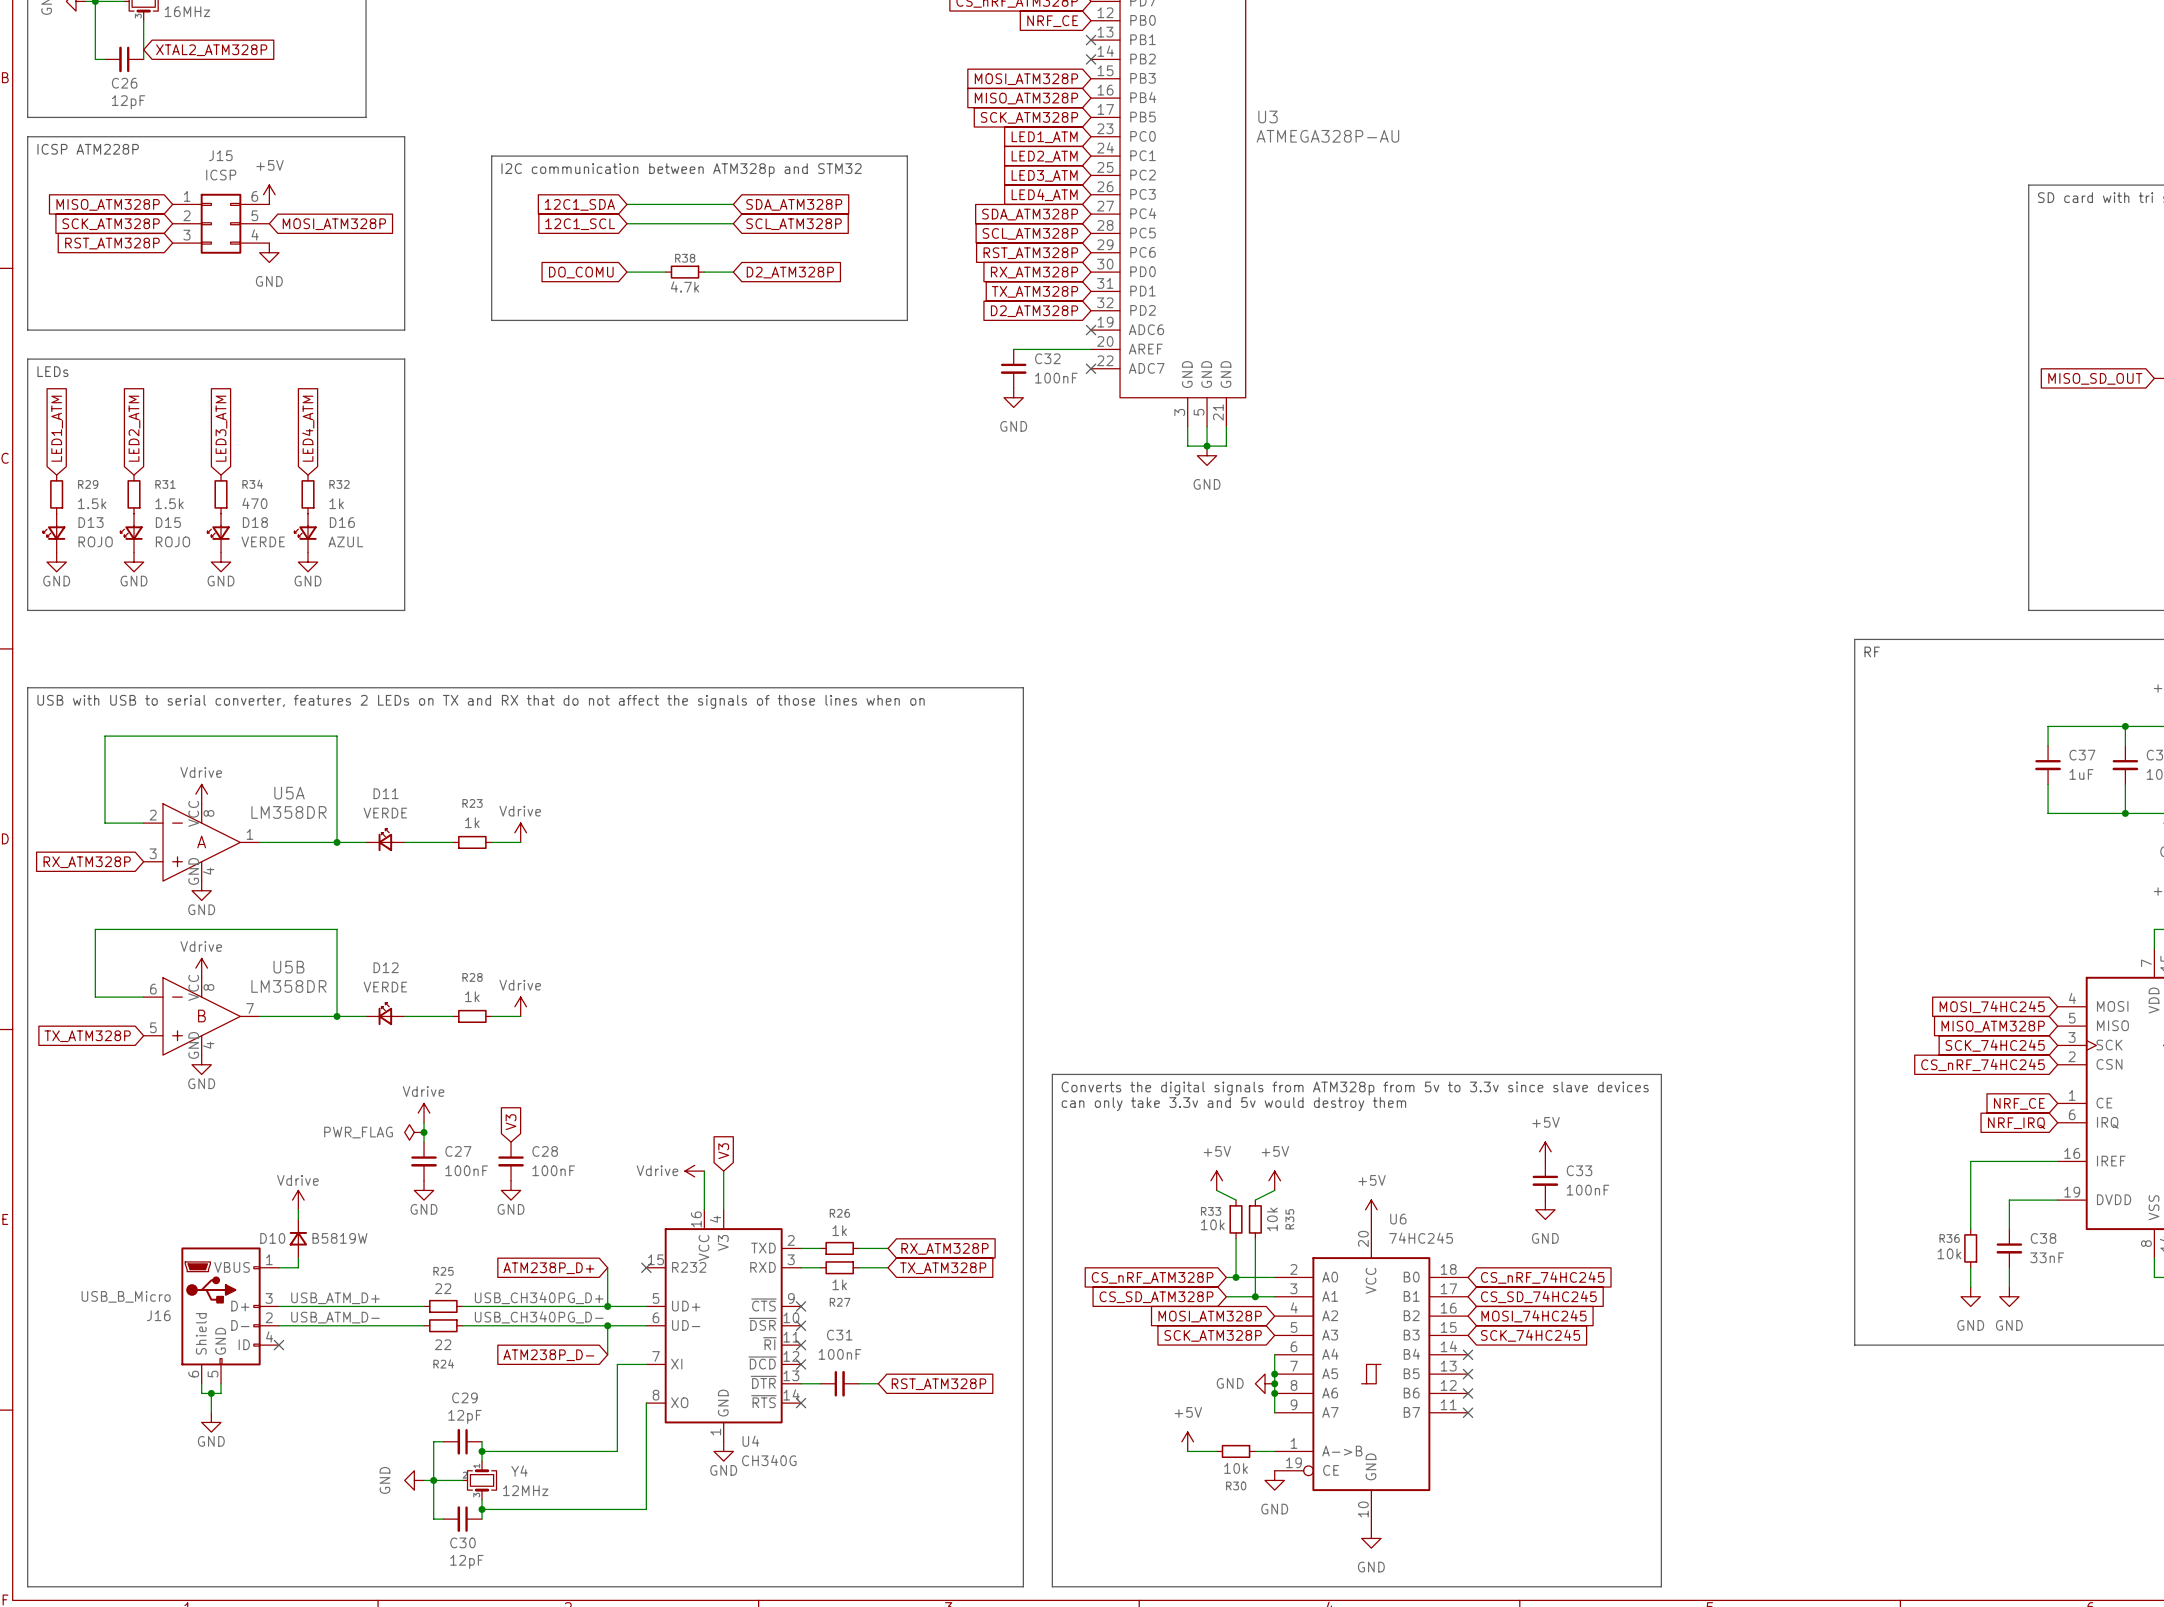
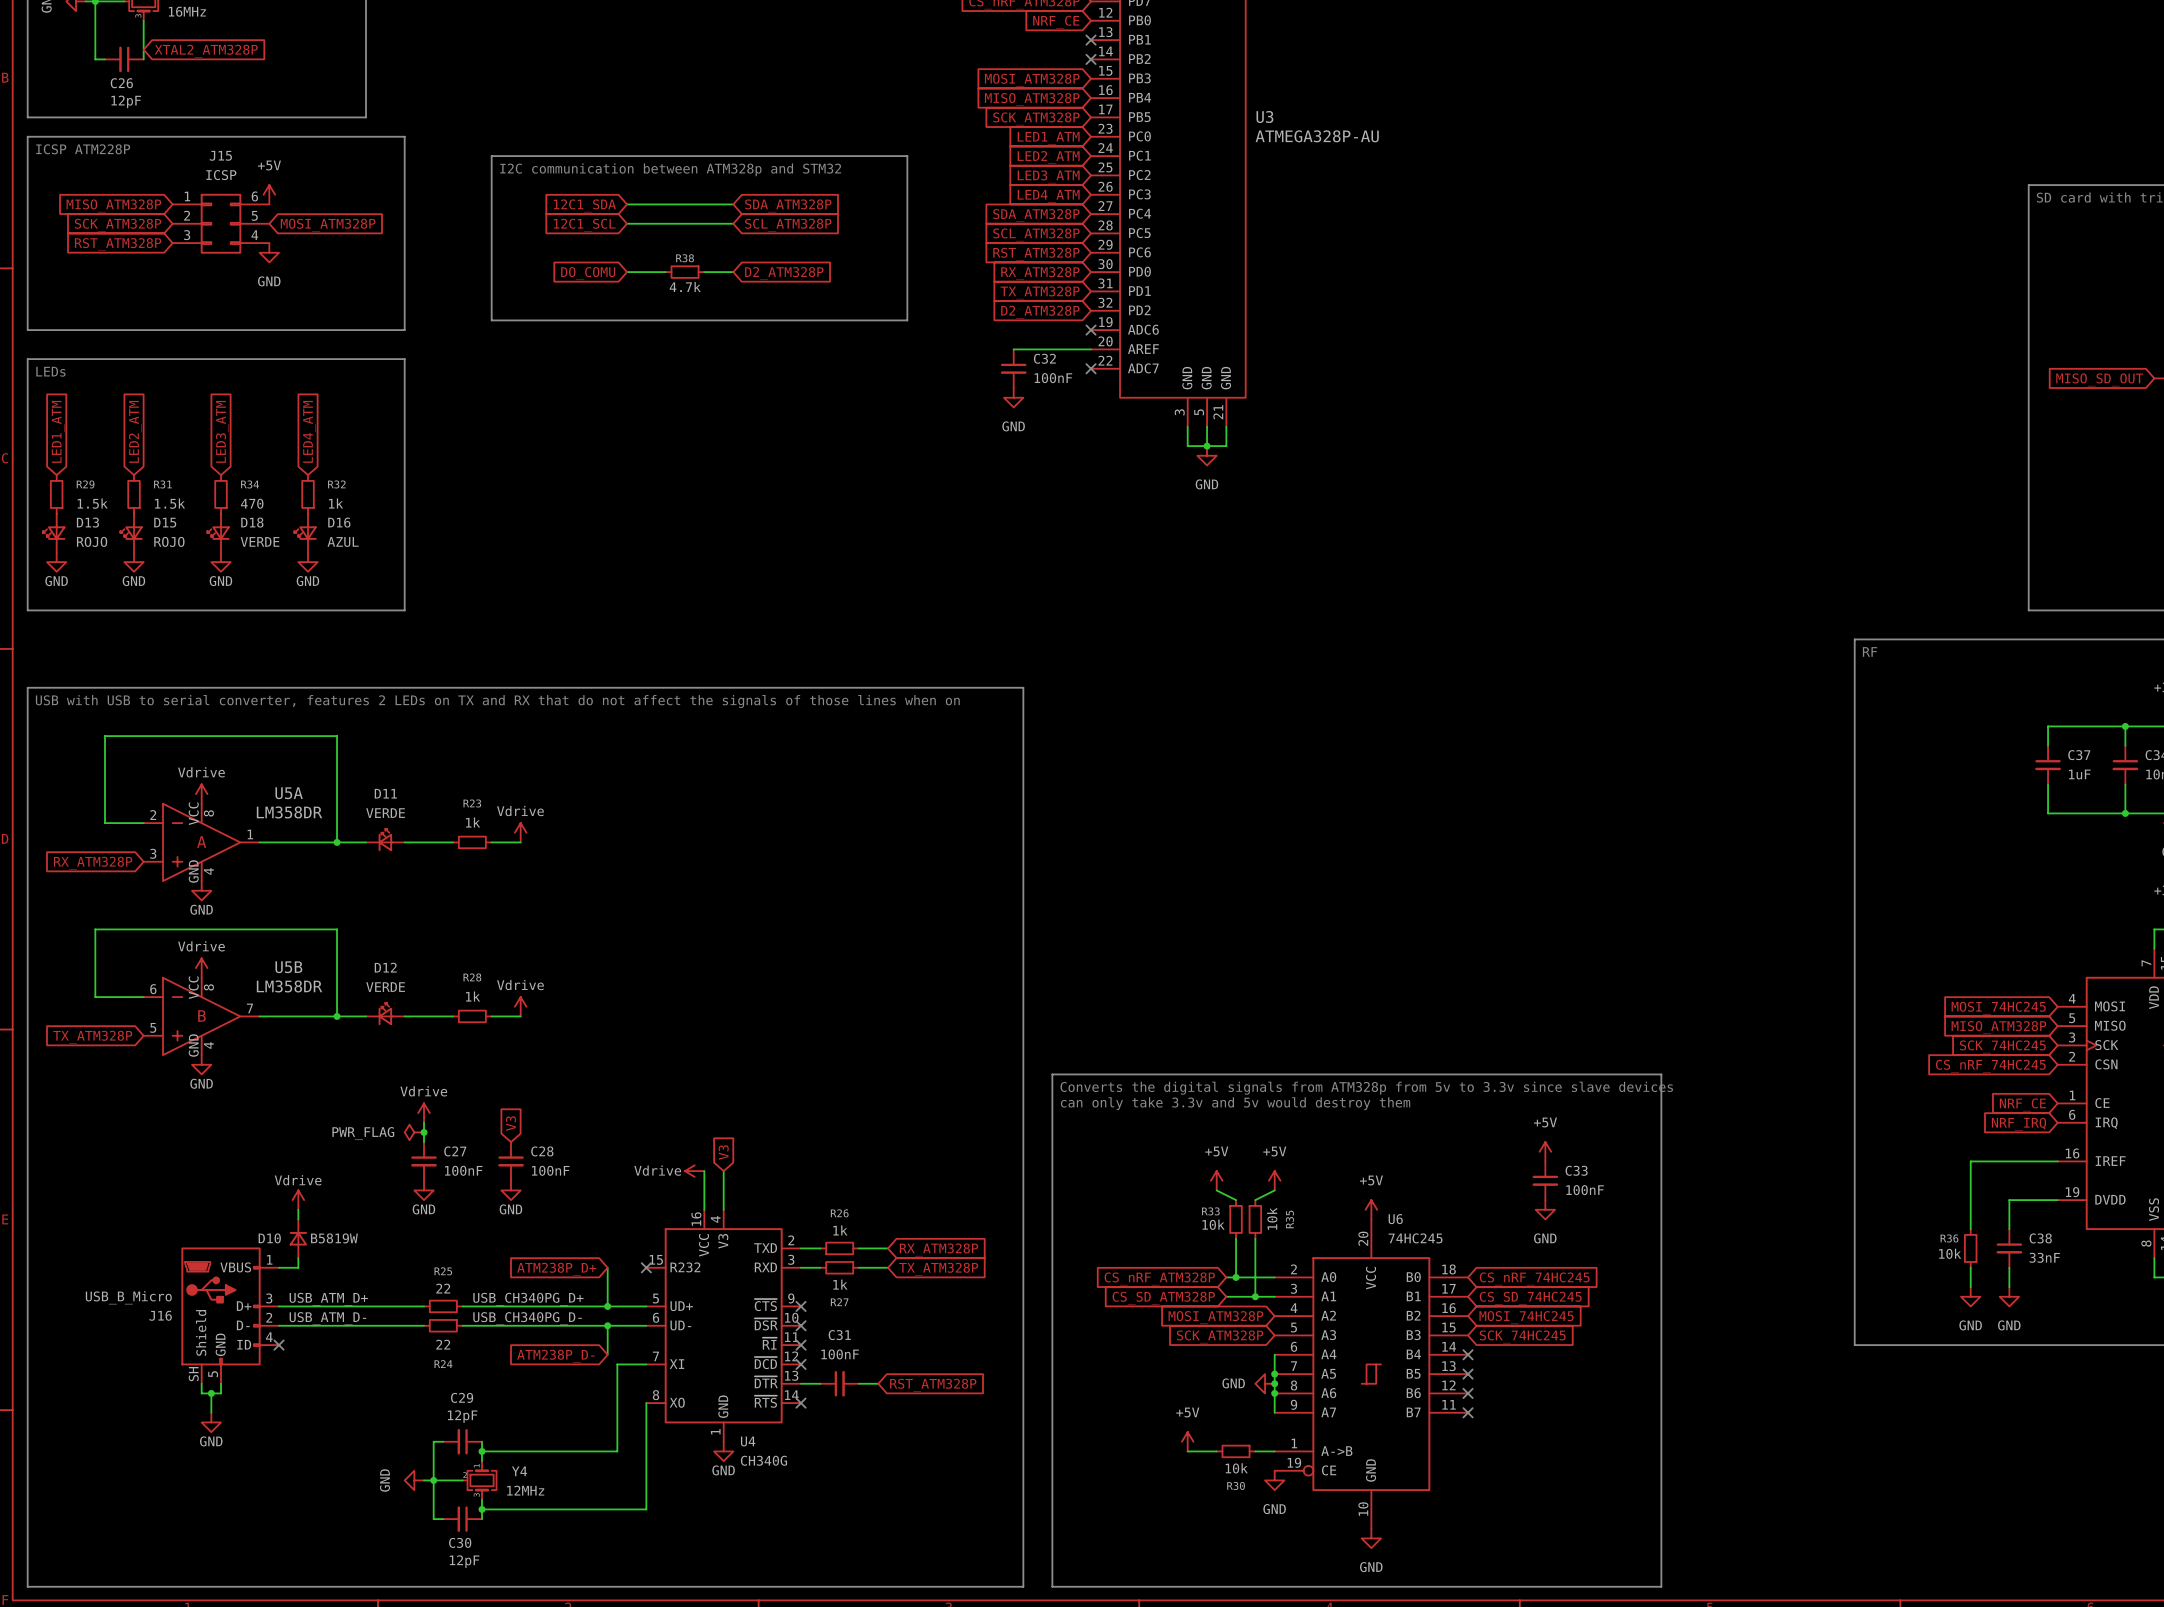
J16 pin number: 6 (193, 1374) -> SH (193, 1374)

